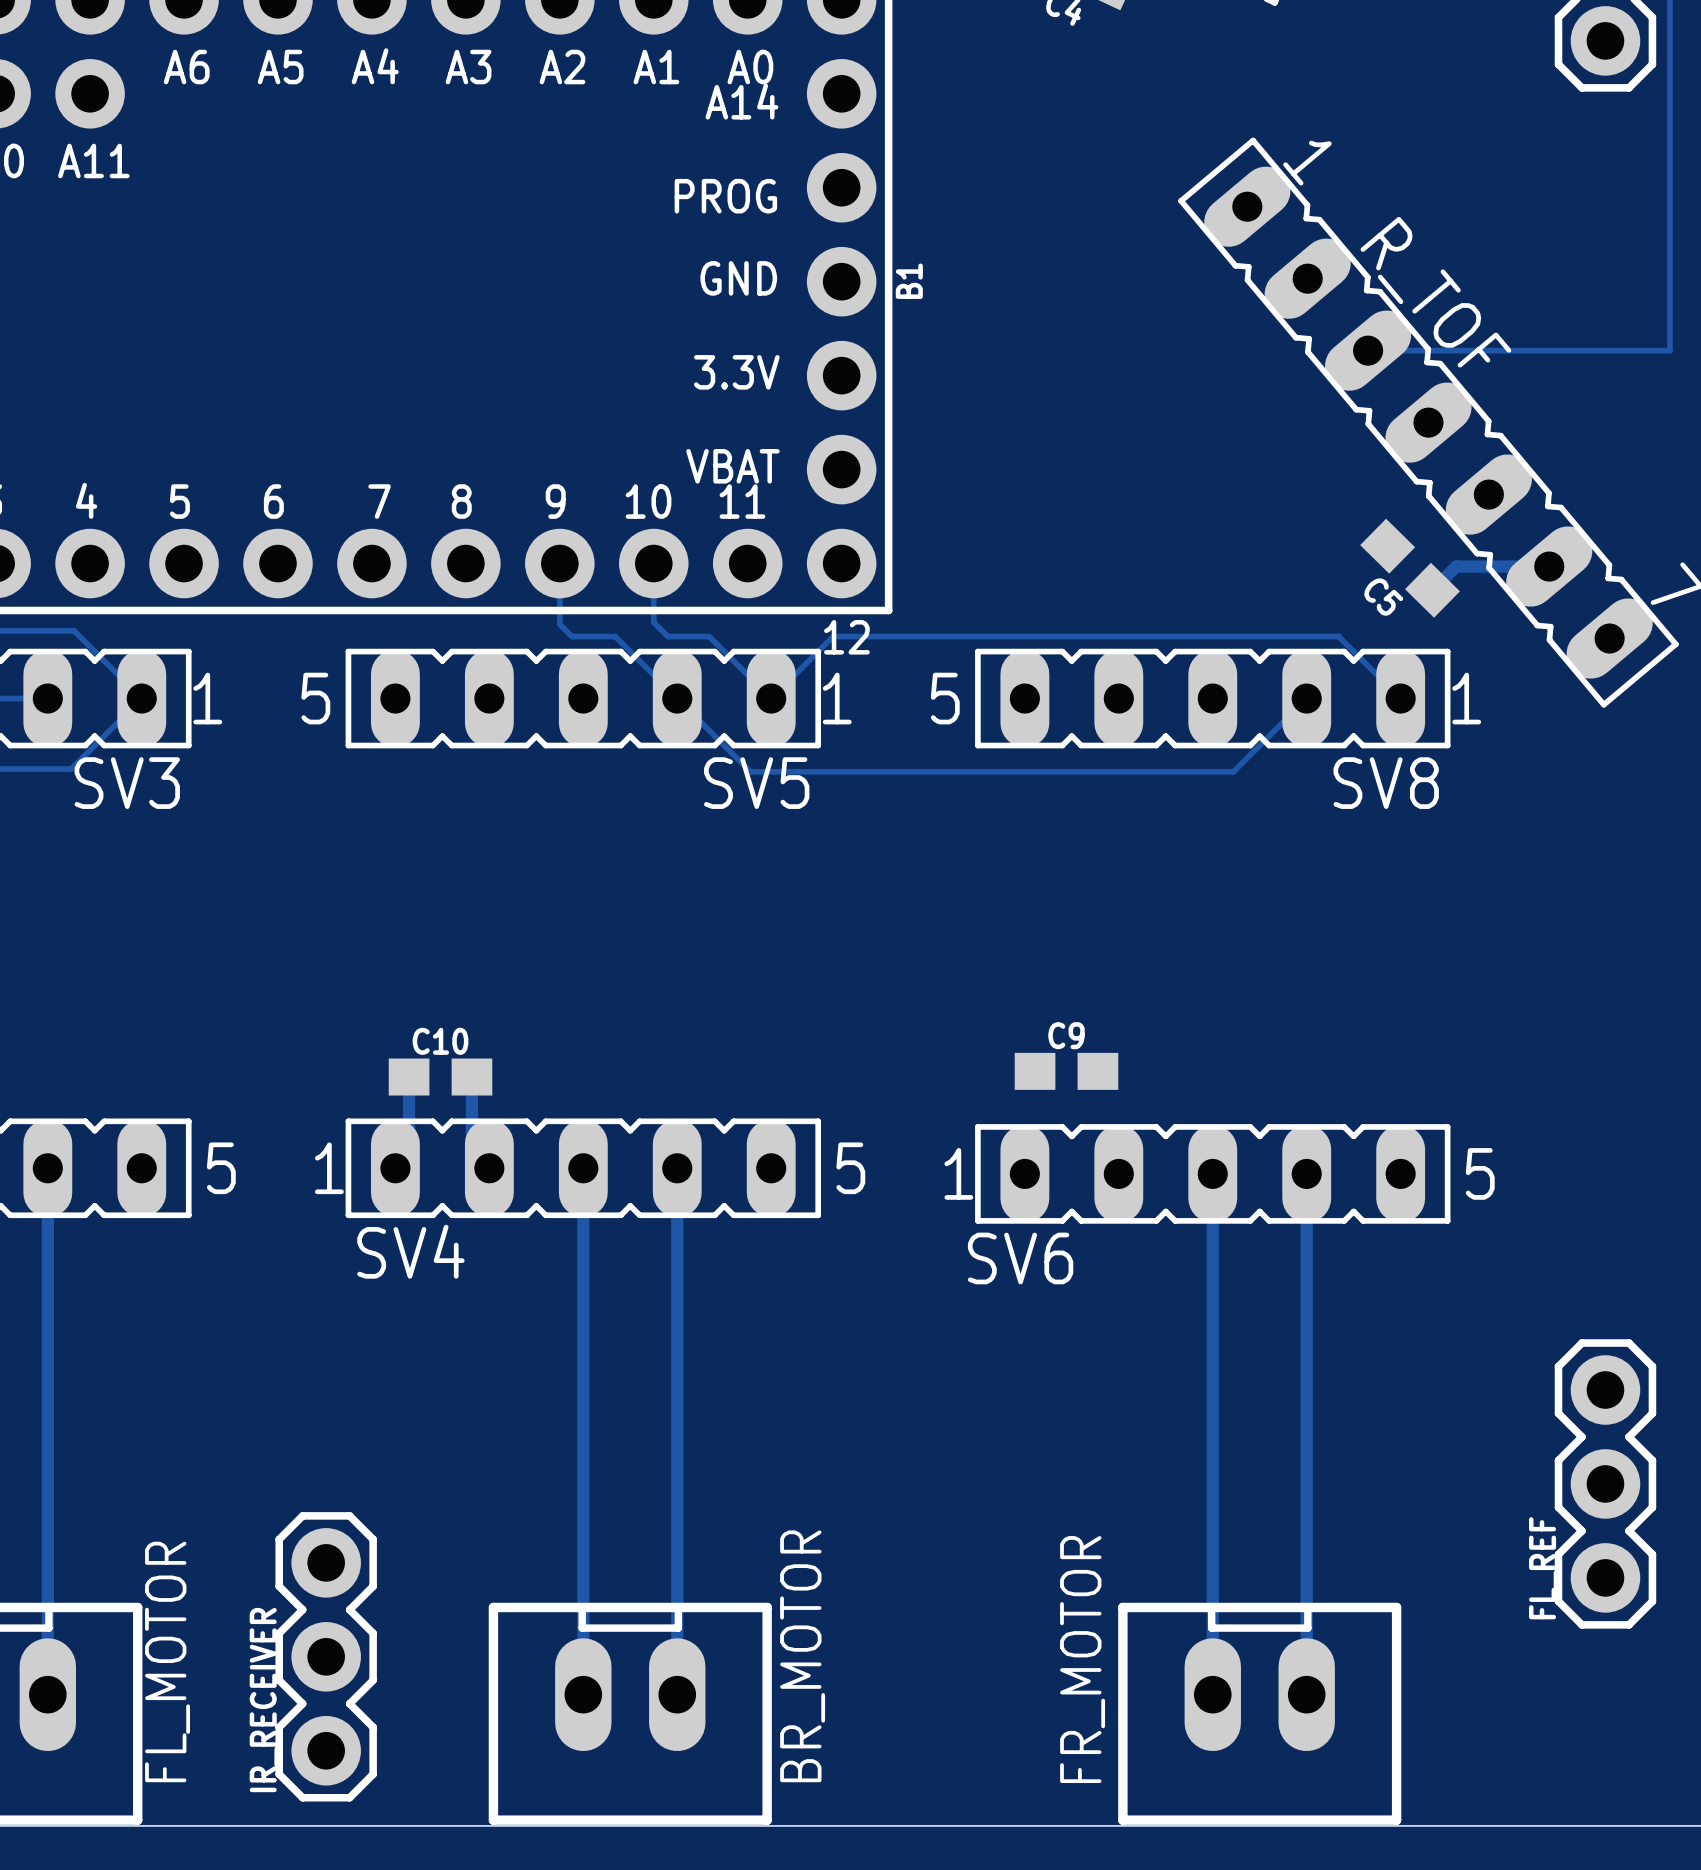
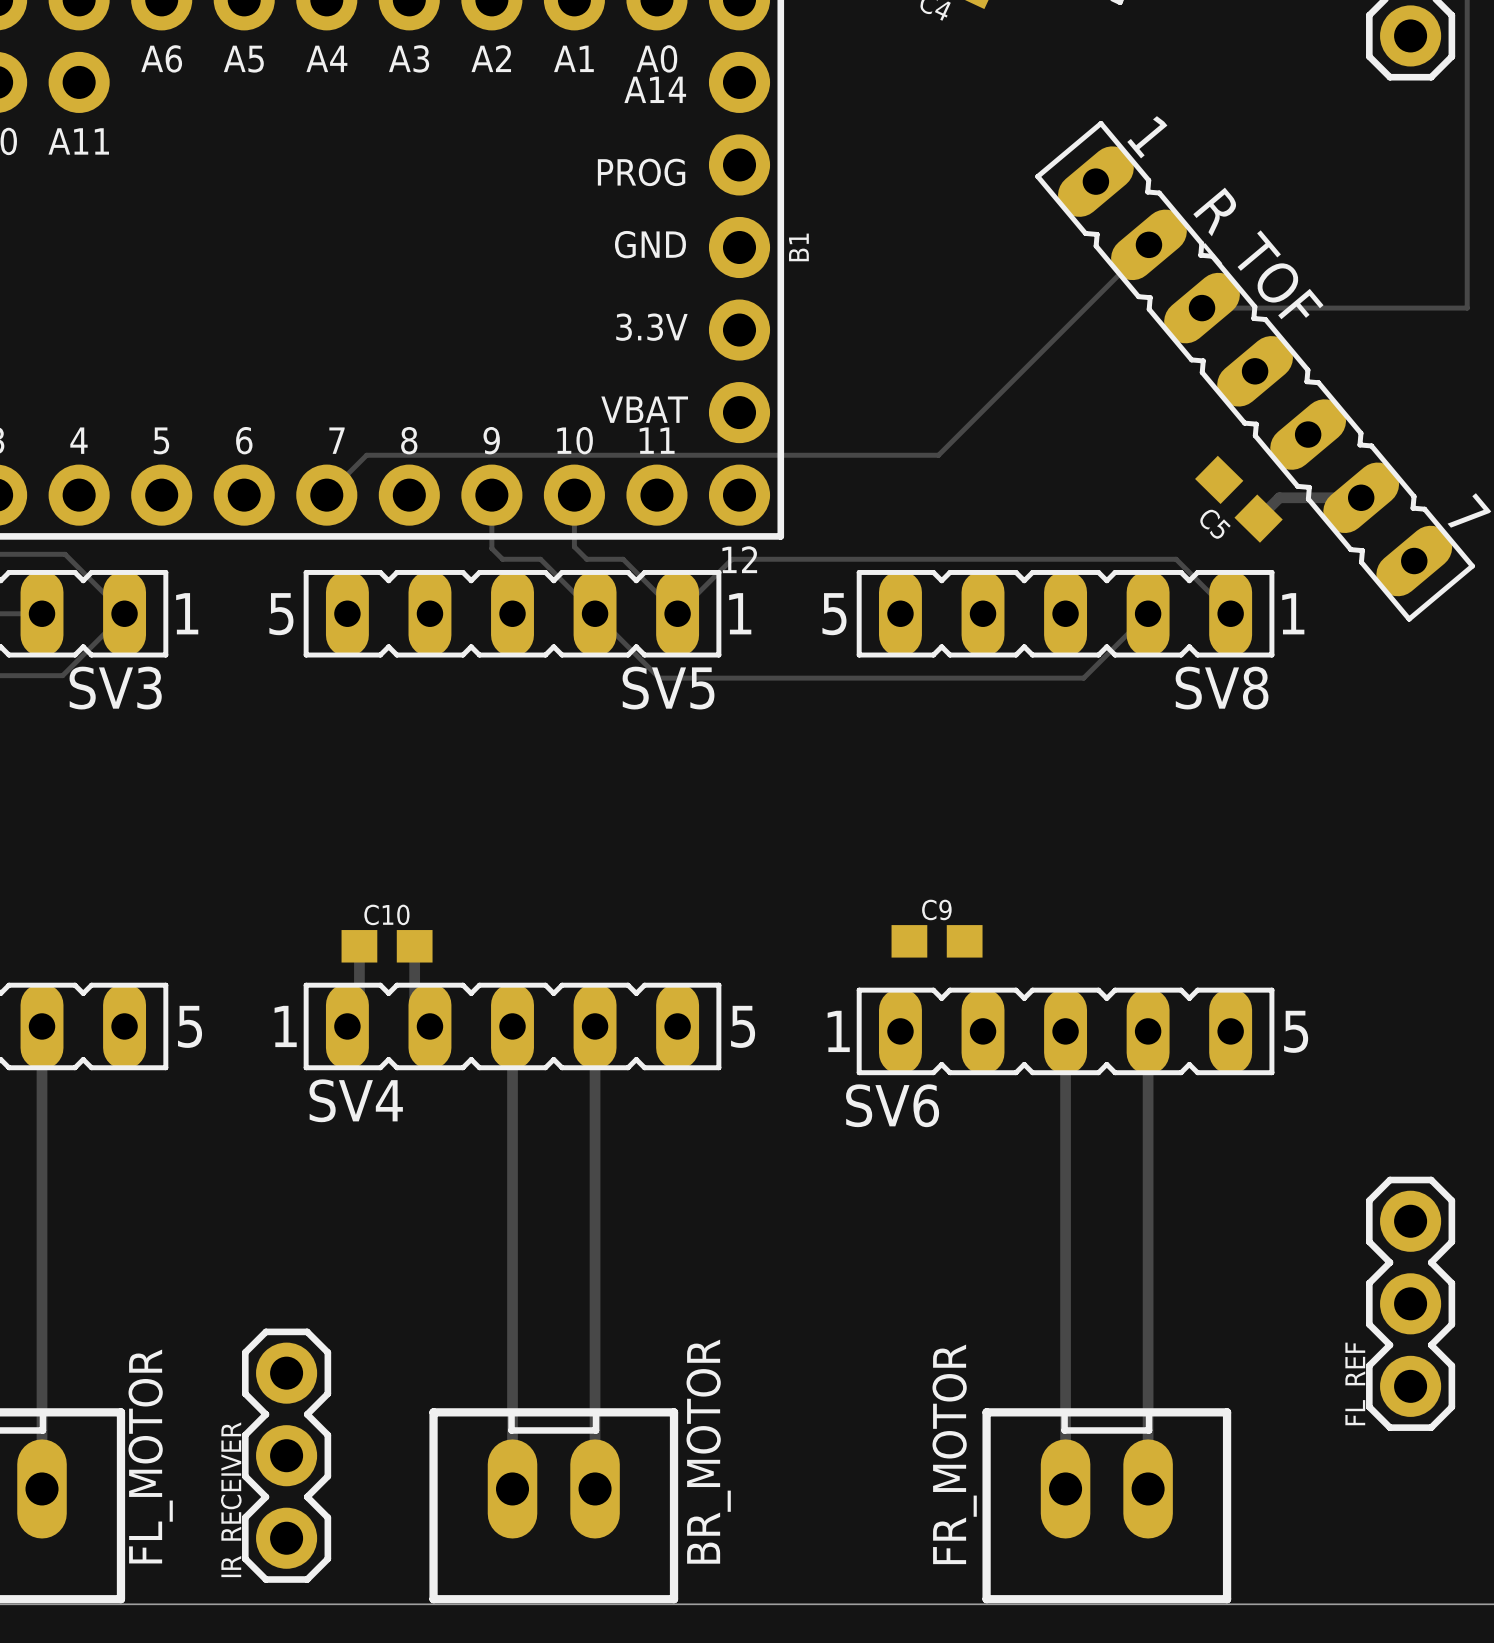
track: none -> (1148, 244) (938, 455) (366, 455) (326, 495)

